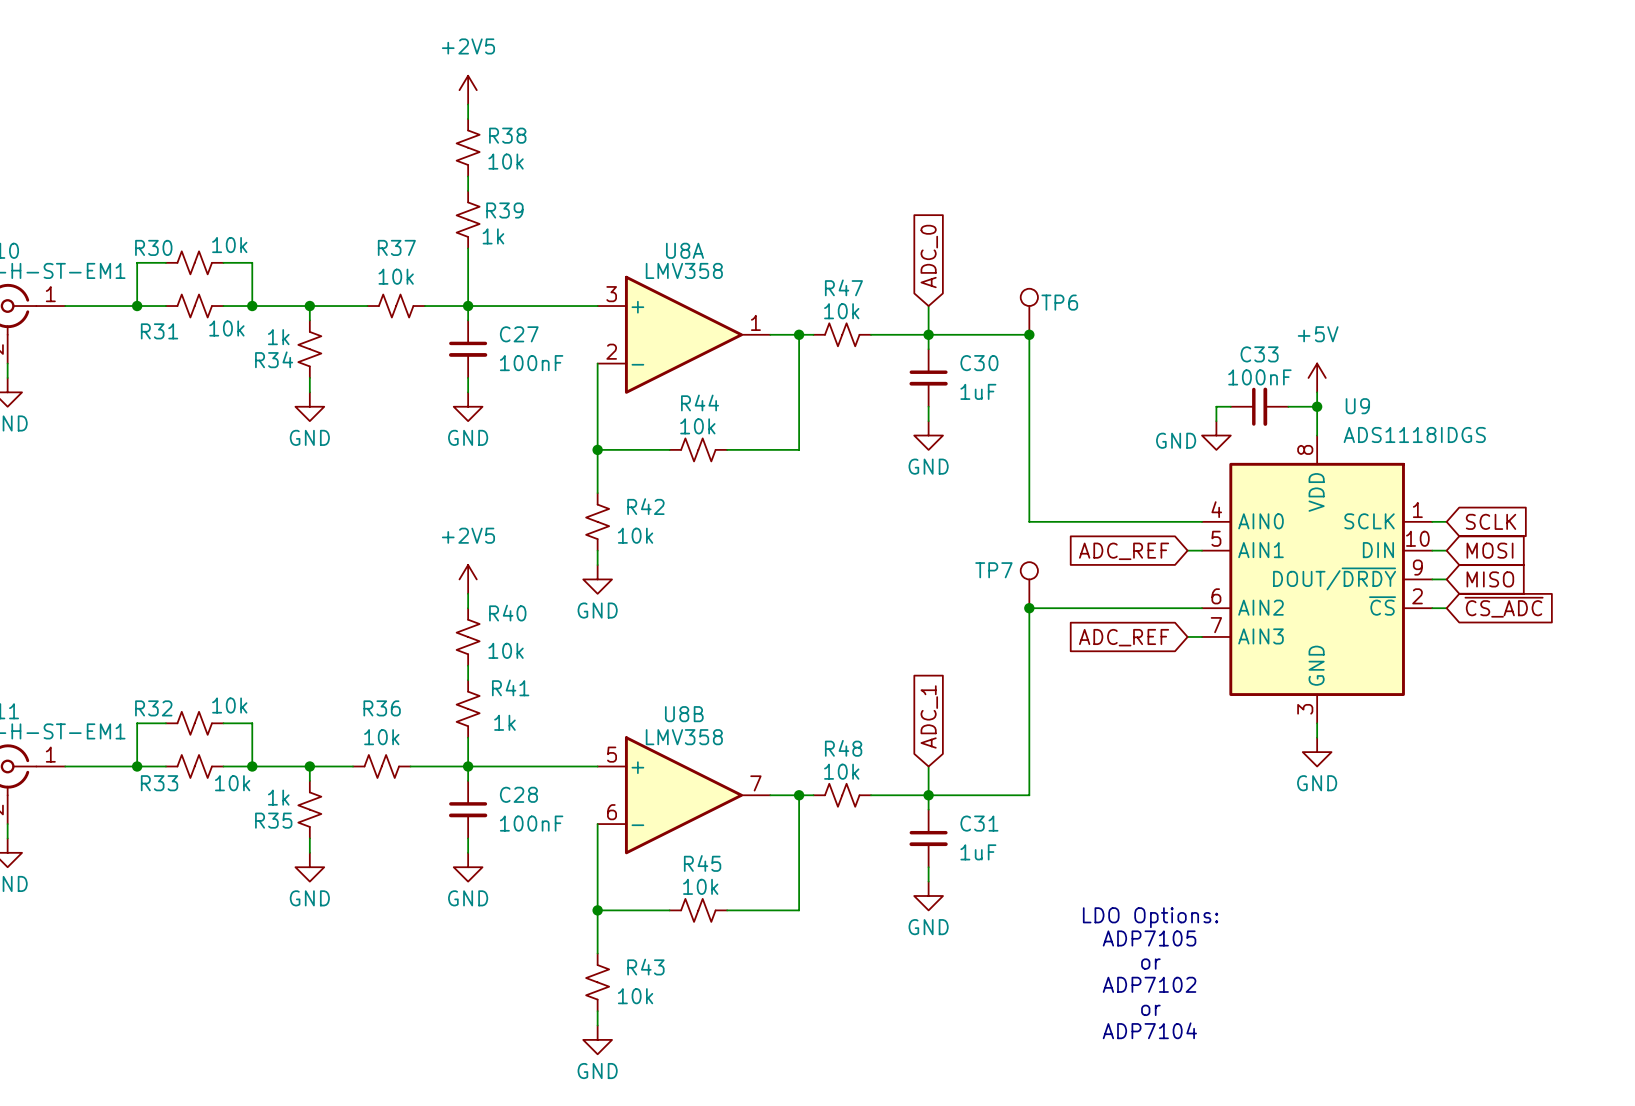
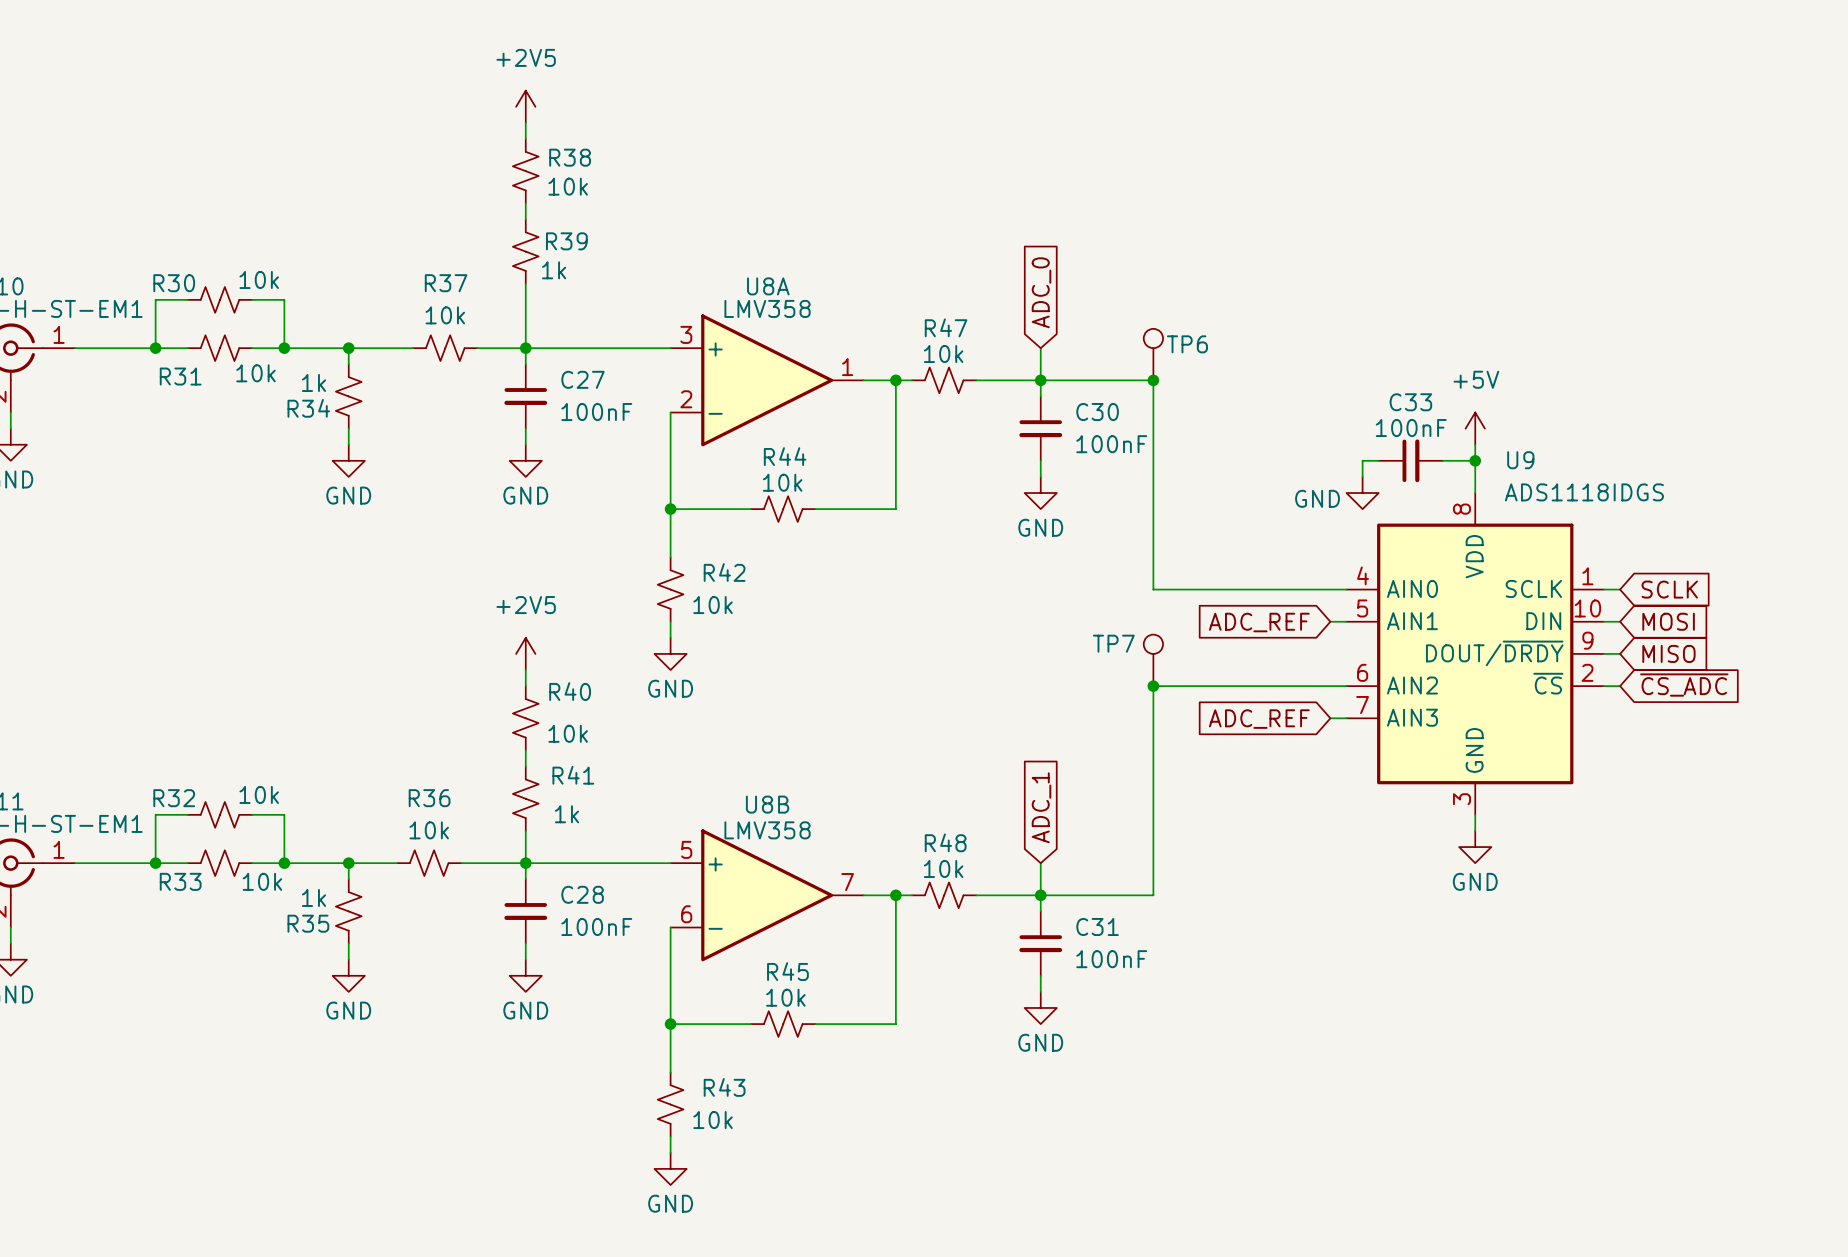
C30 value: 1uF (978, 391) -> 100nF (1111, 444)
C31 value: 1uF (978, 852) -> 100nF (1111, 959)
text: LDO Options: (1150, 917) -> none
text: ADP7105 (1149, 938) -> none
text: or (1150, 964) -> none
text: ADP7102 (1149, 984) -> none
text: or (1150, 1010) -> none
text: ADP7104 (1149, 1030) -> none

